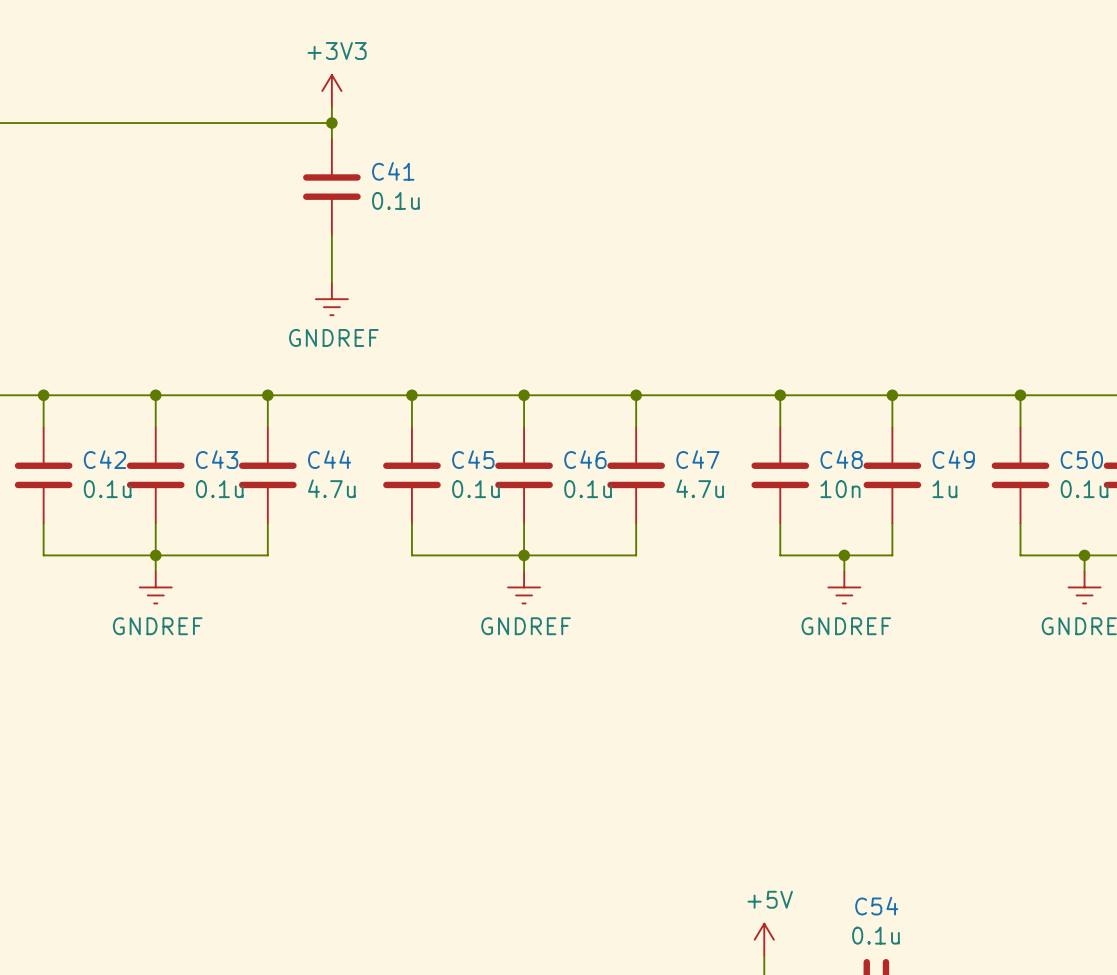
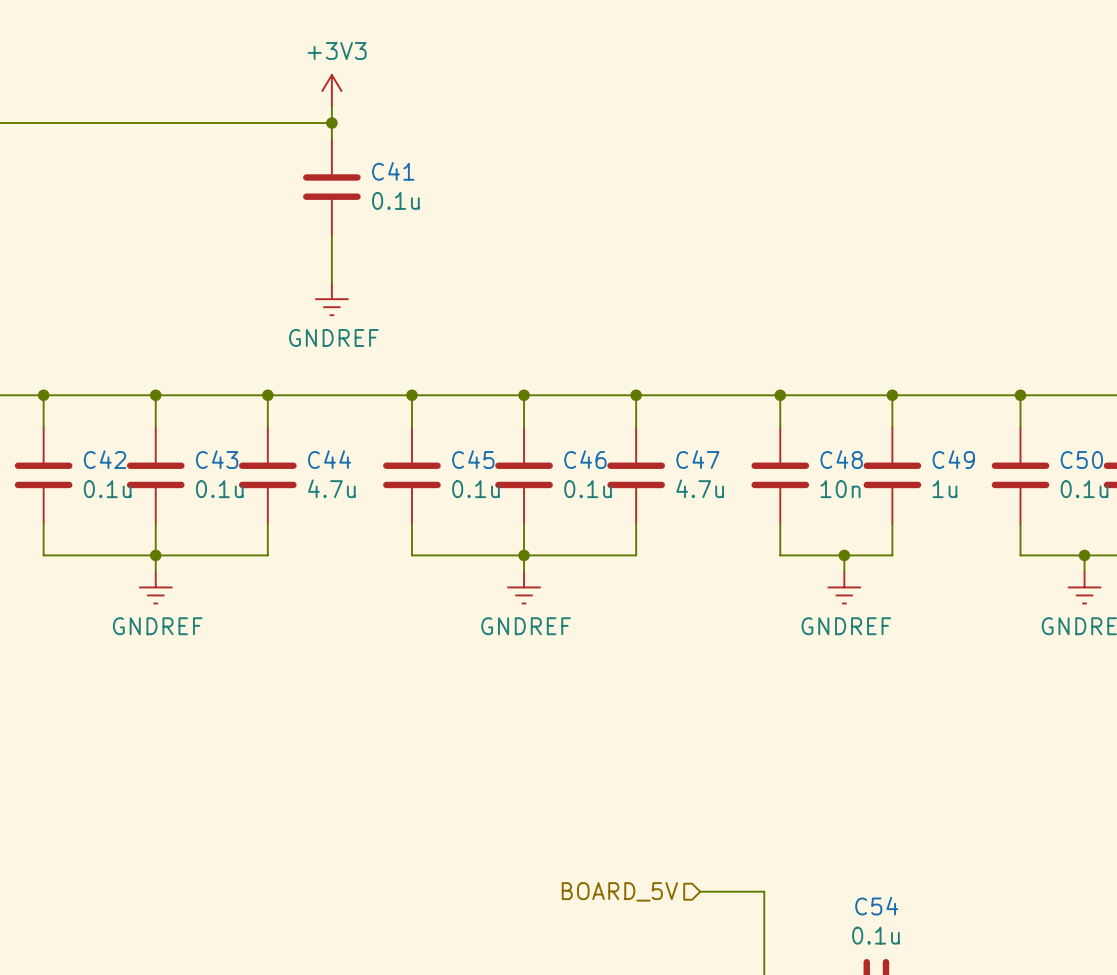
hierarchical label: none -> BOARD_5V (619, 891)
wire: none -> (700, 891) (764, 891) (764, 955)
power symbol: +5V (764, 939) -> none

